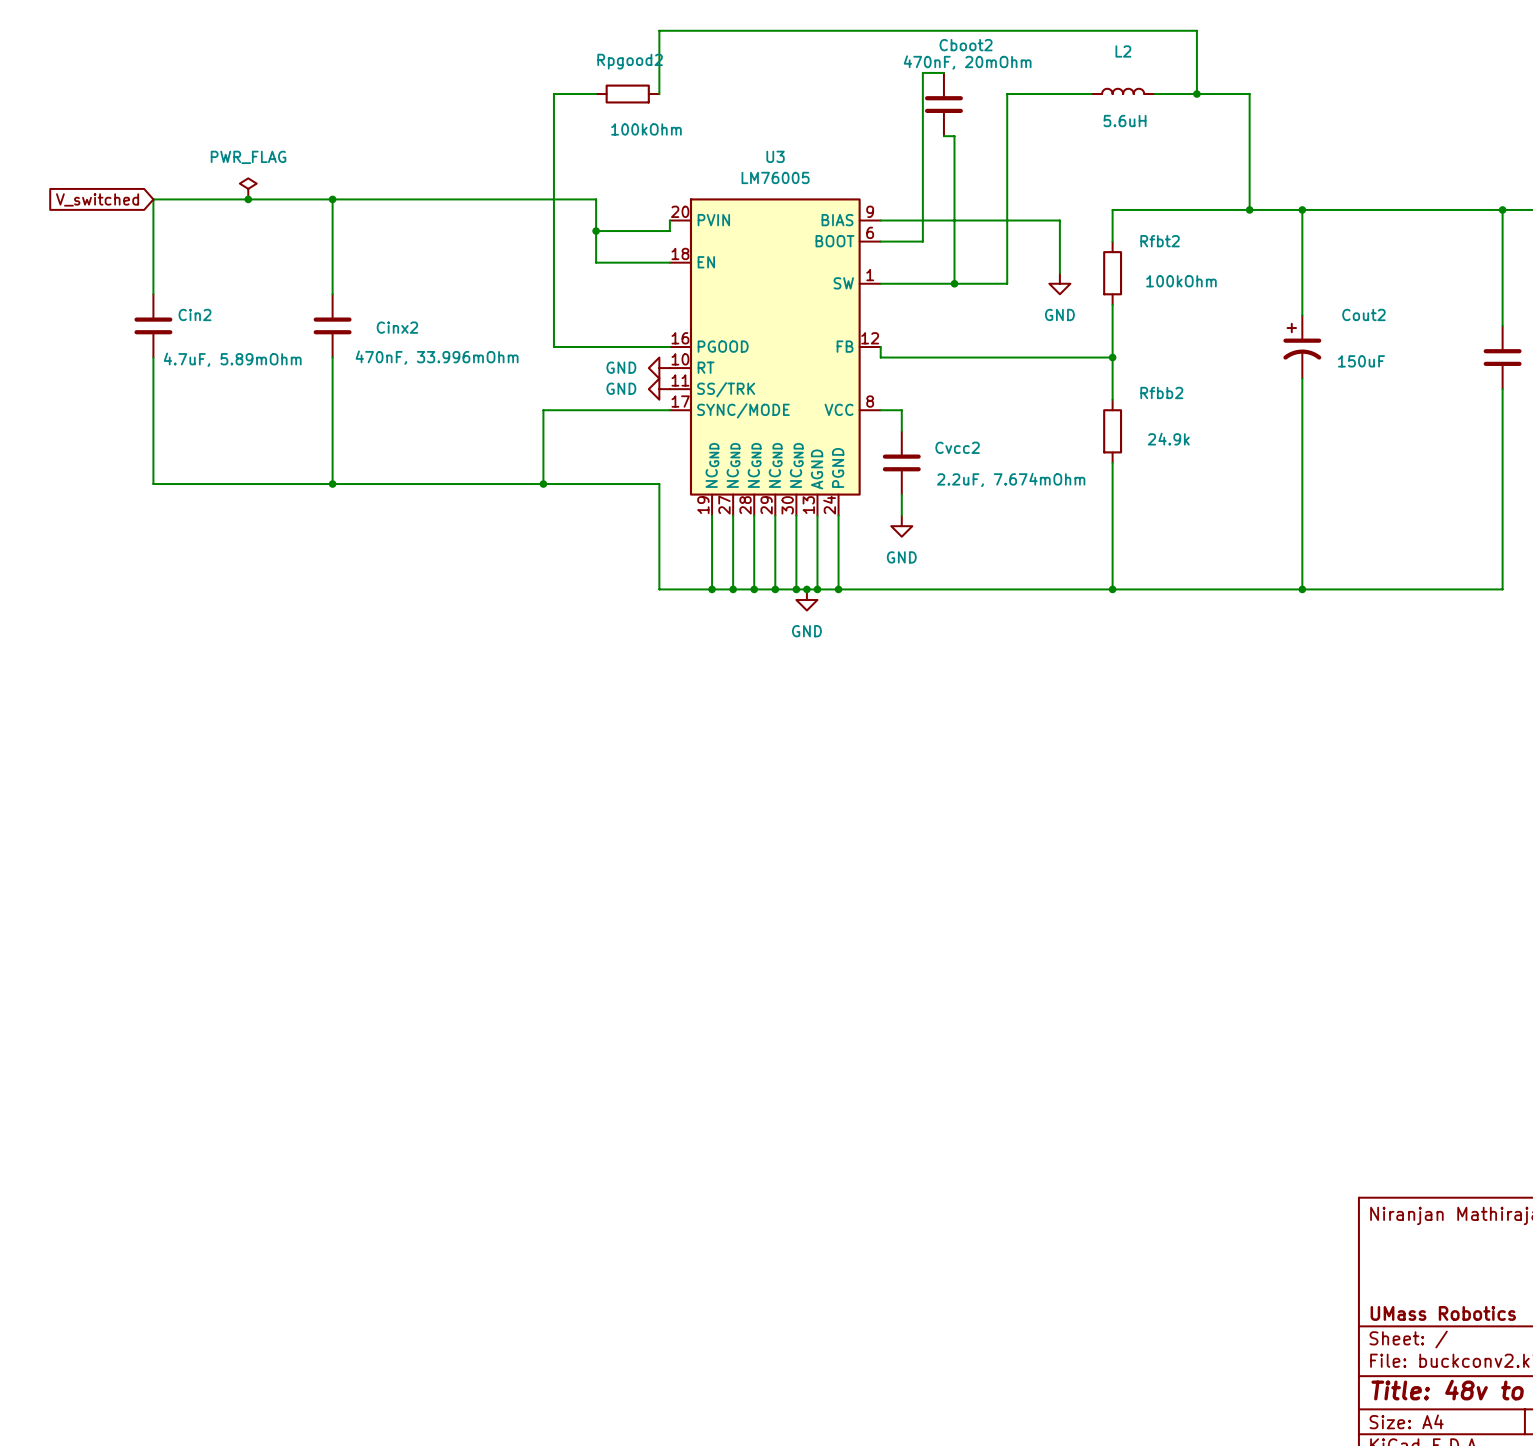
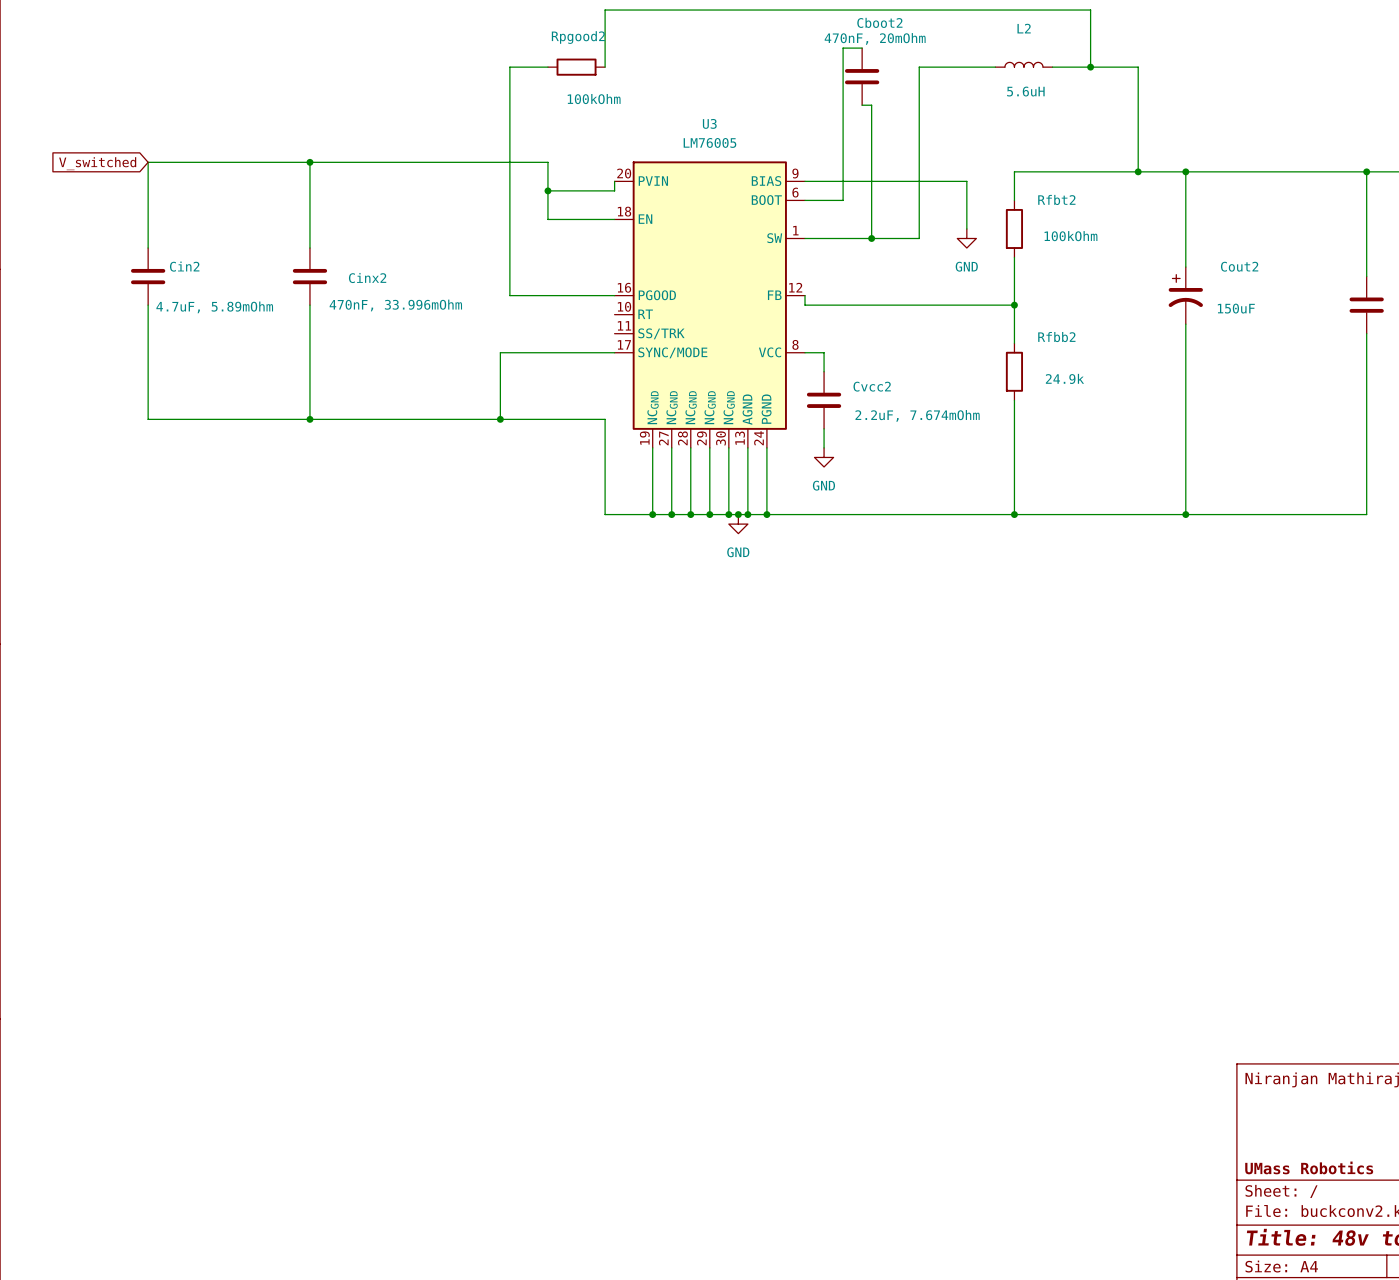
power symbol: PWR_FLAG (248, 188) -> none
junction: (248, 199) -> none
power symbol: GND (659, 368) -> none
power symbol: GND (659, 389) -> none

